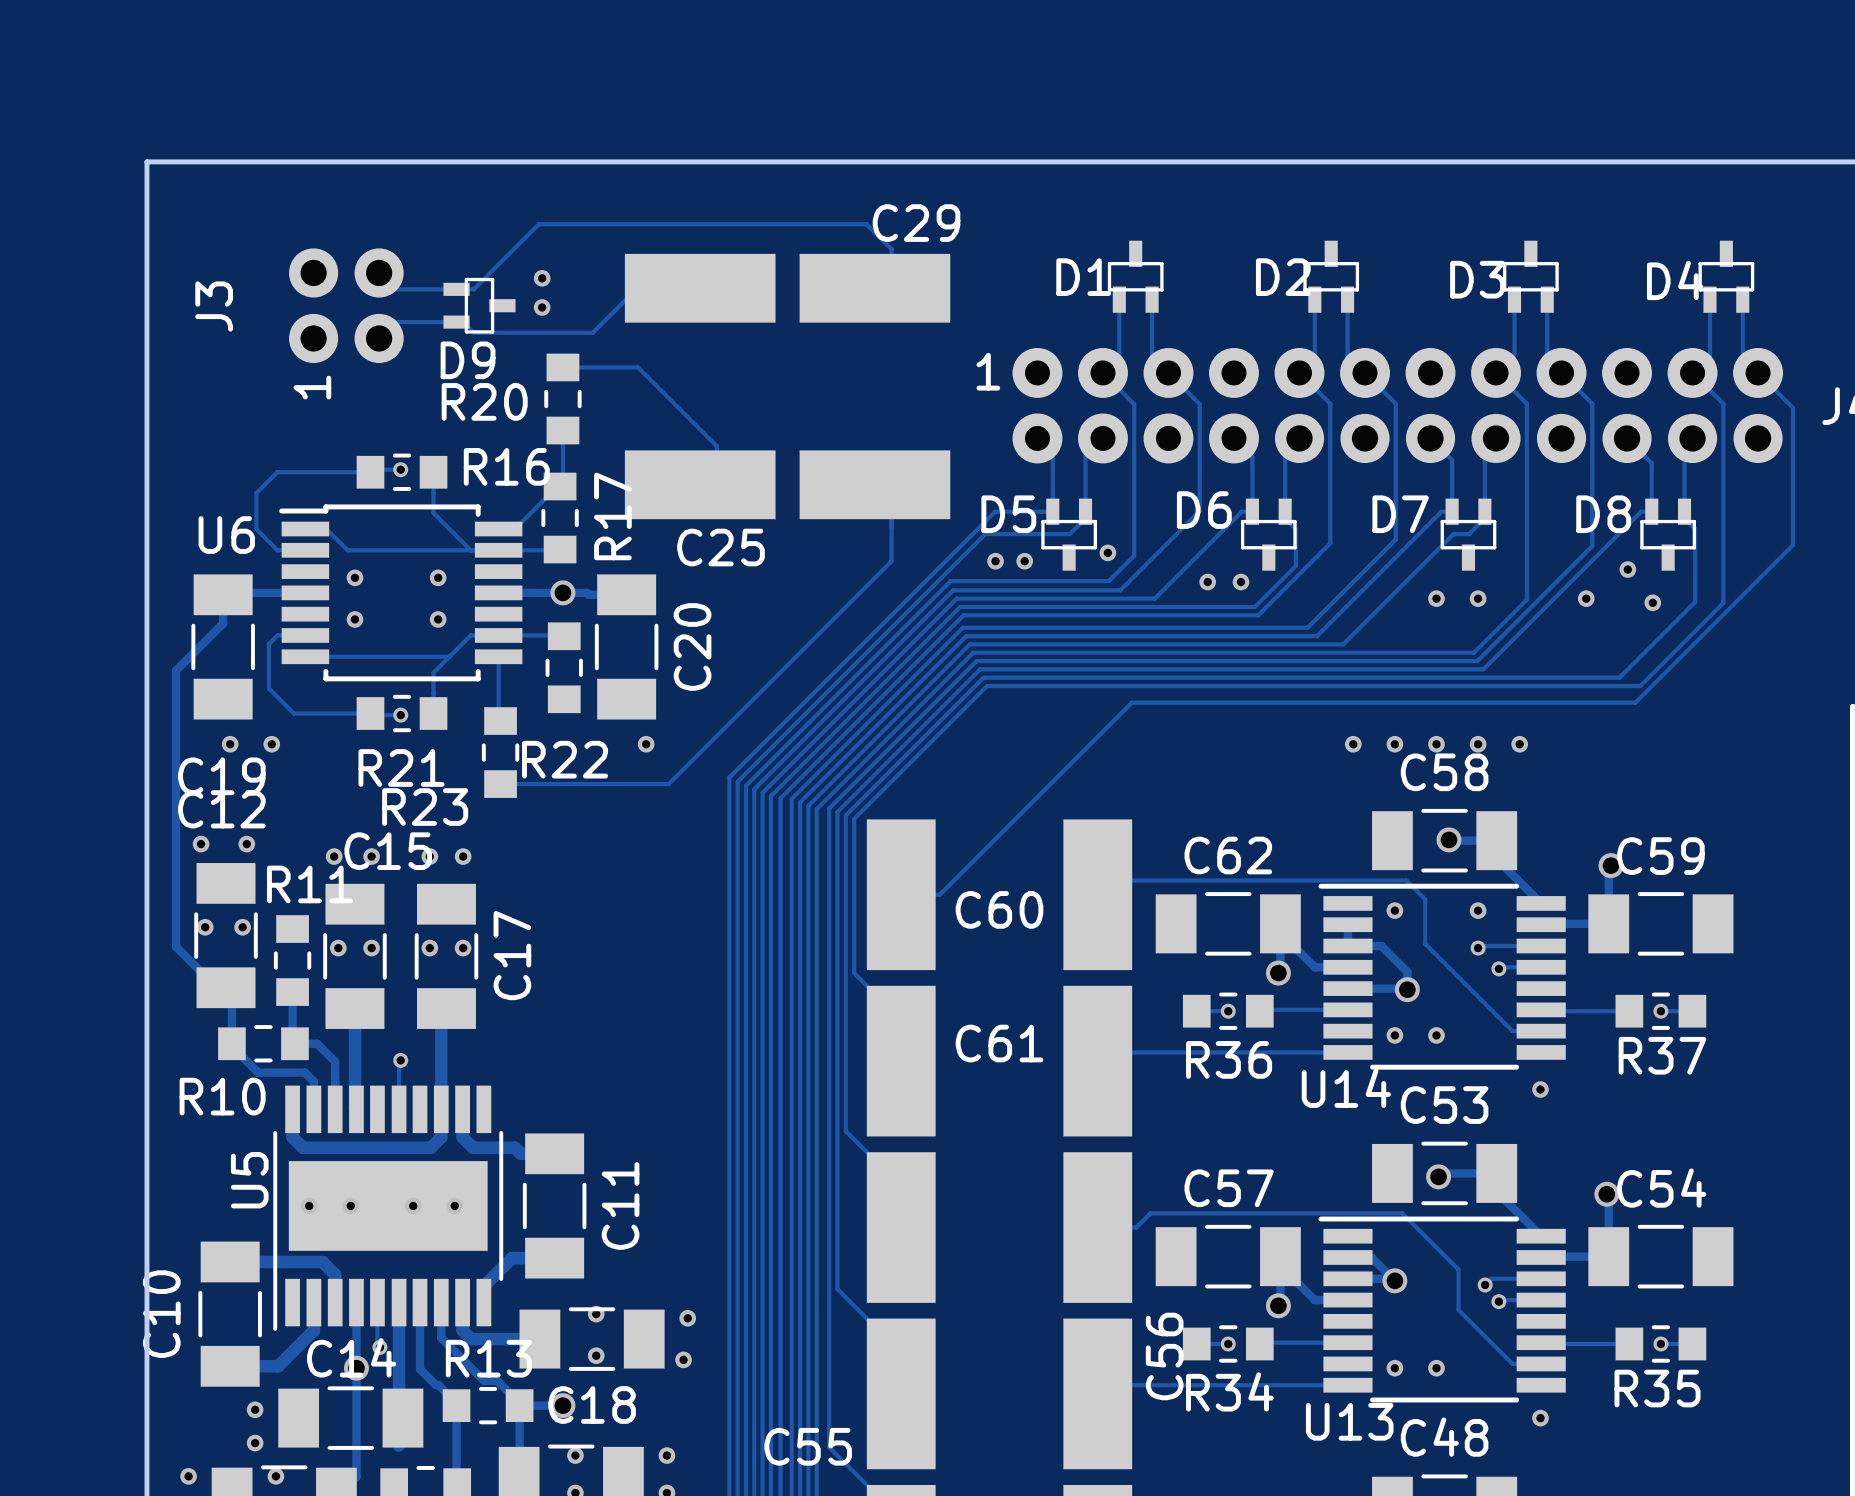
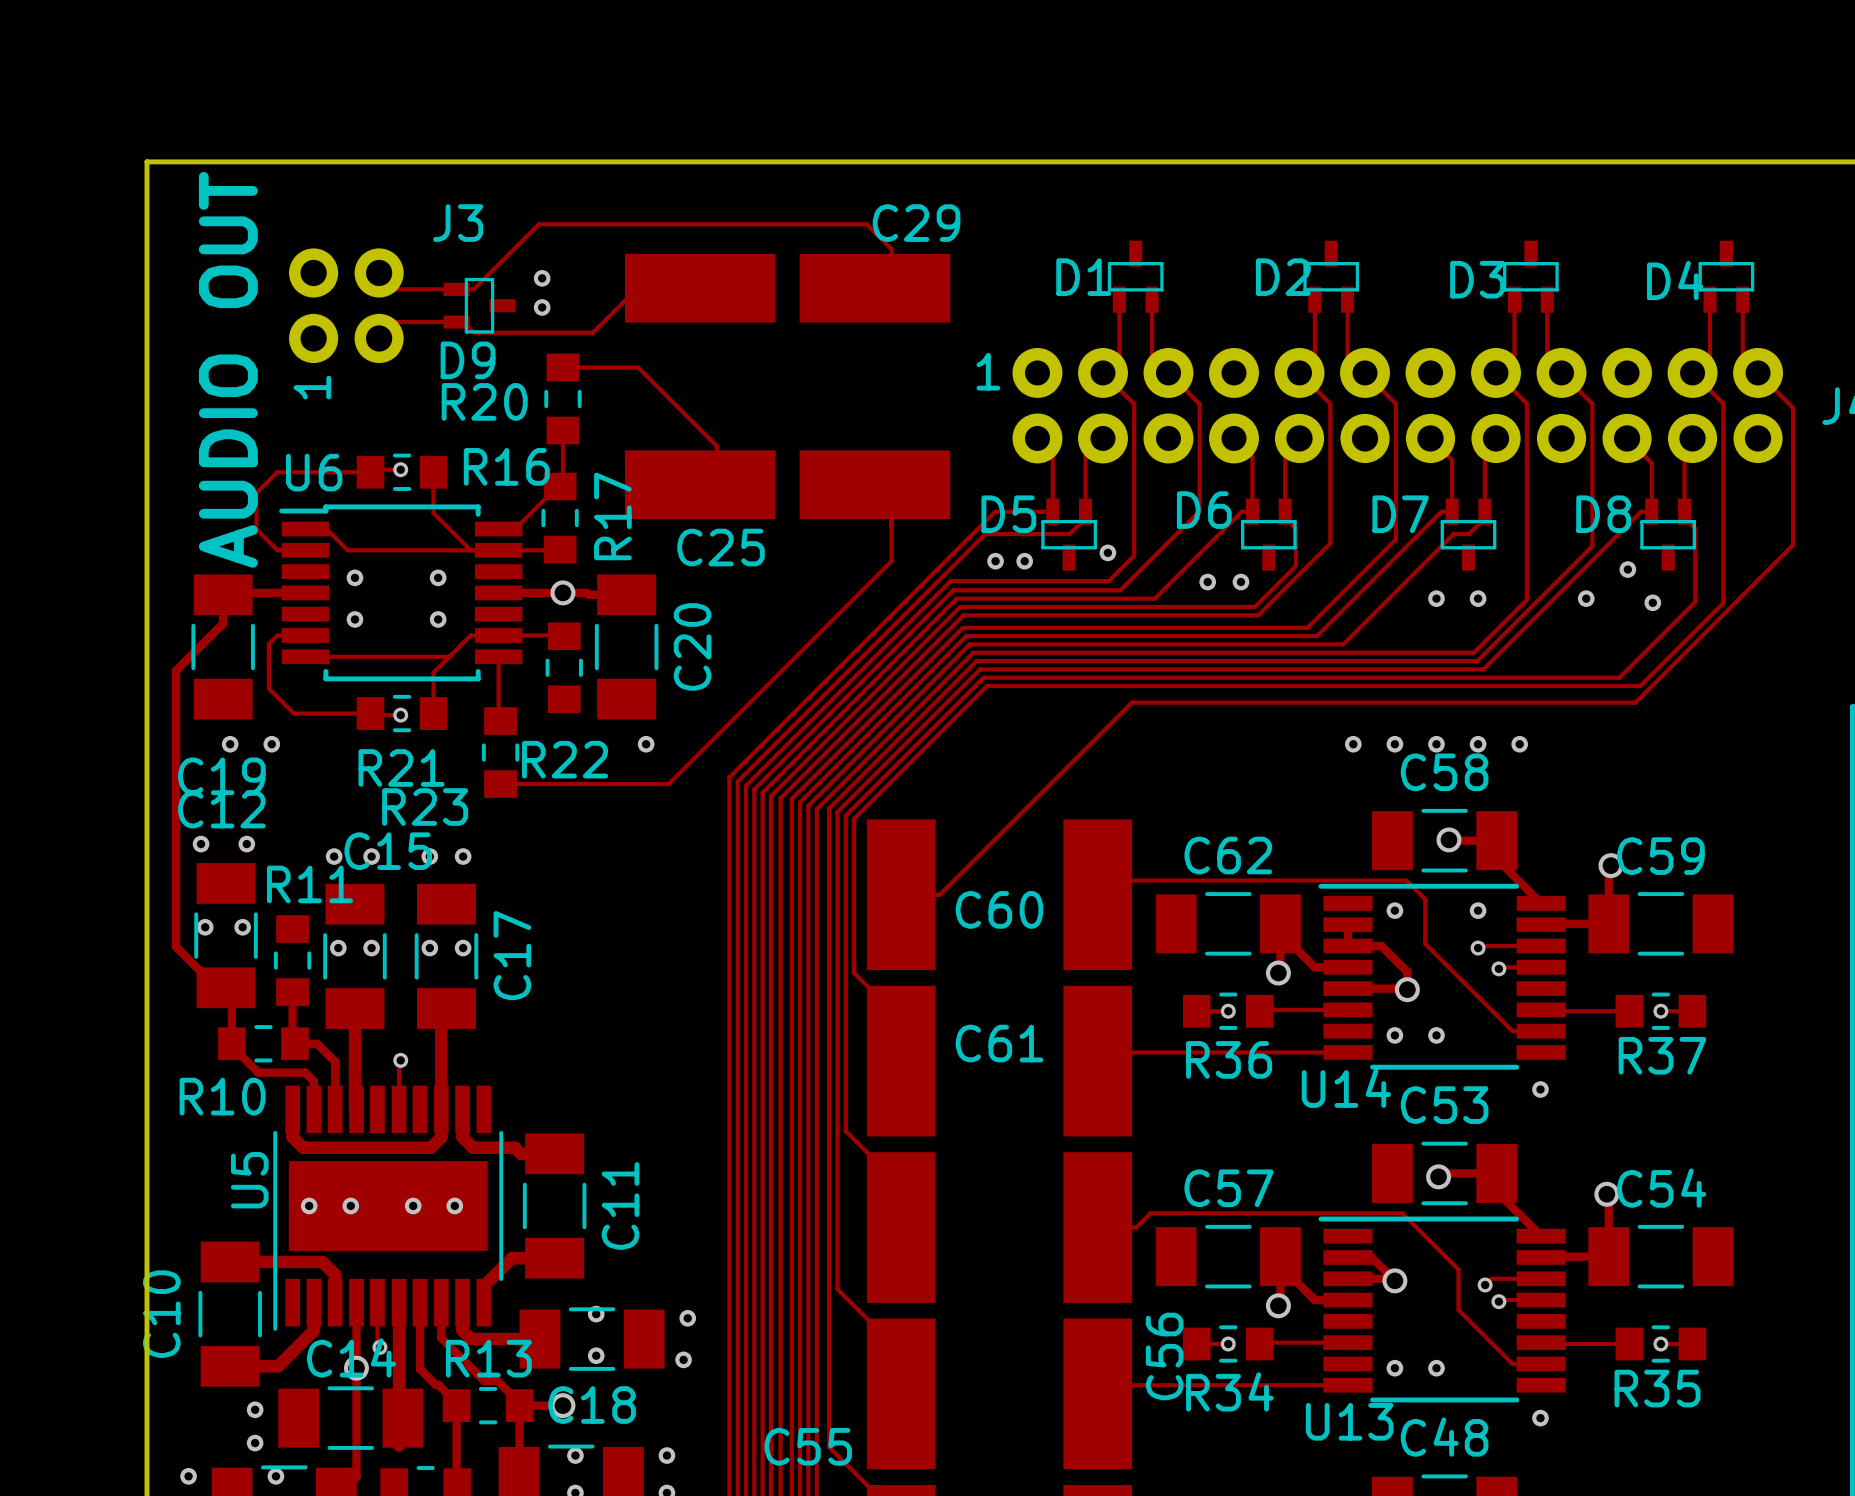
J3 name rotation: 0° (214, 306) -> 90° clockwise (458, 223)
J3 name position: J3 (214, 306) -> J3 (458, 223)
text: none -> AUDIO OUT (228, 369)
U6 name position: U6 (226, 535) -> U6 (314, 472)

